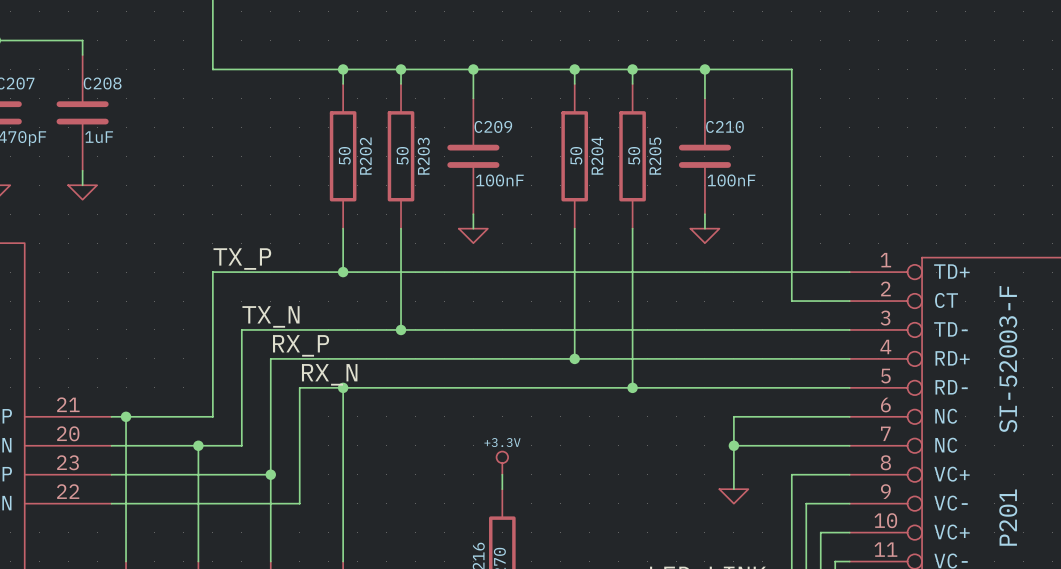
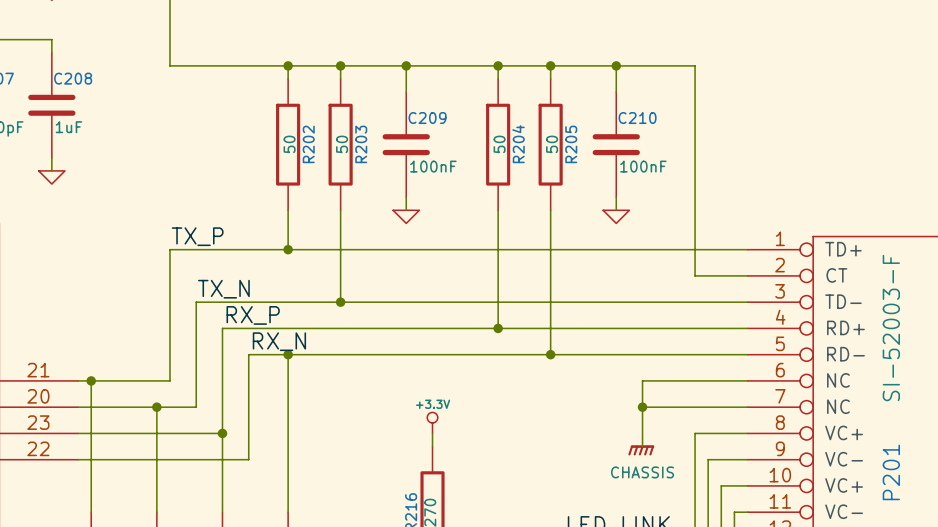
power symbol shape: [719, 489, 749, 504] -> [628, 445, 655, 456]
power symbol text: none -> CHASSIS (642, 472)

